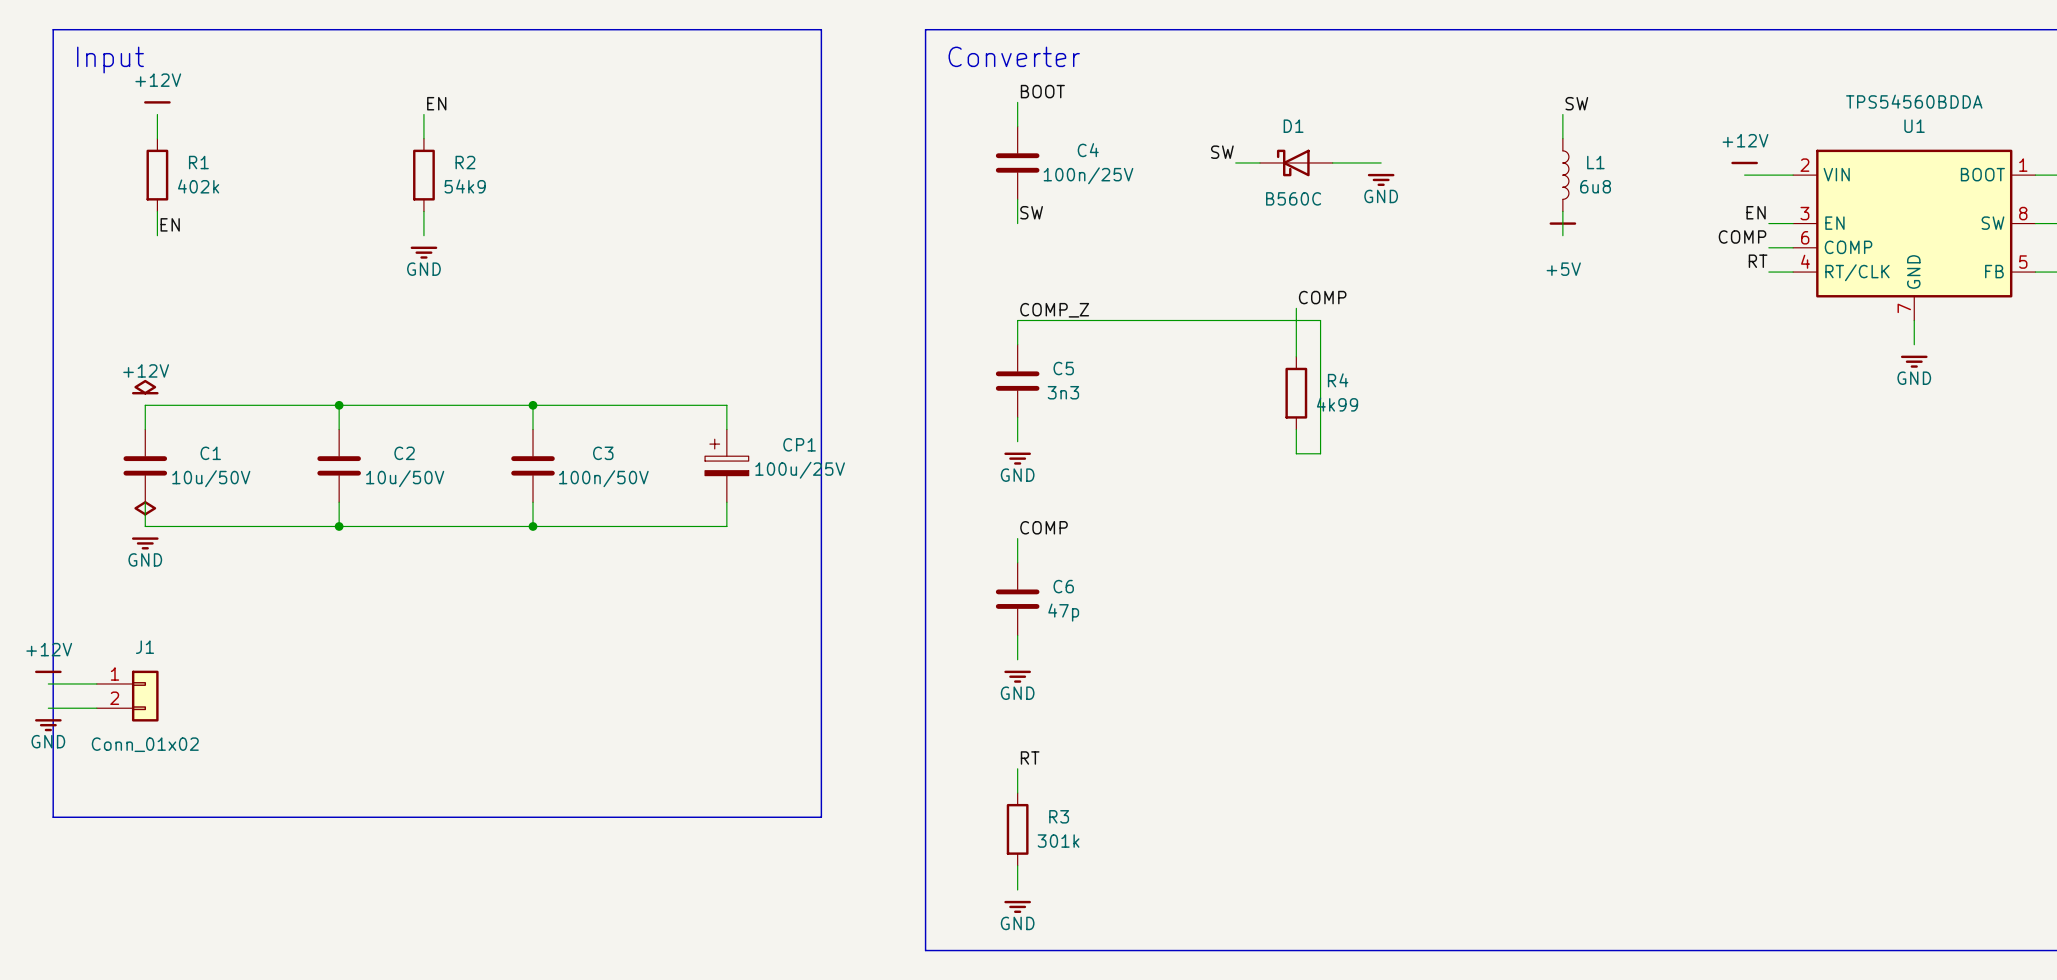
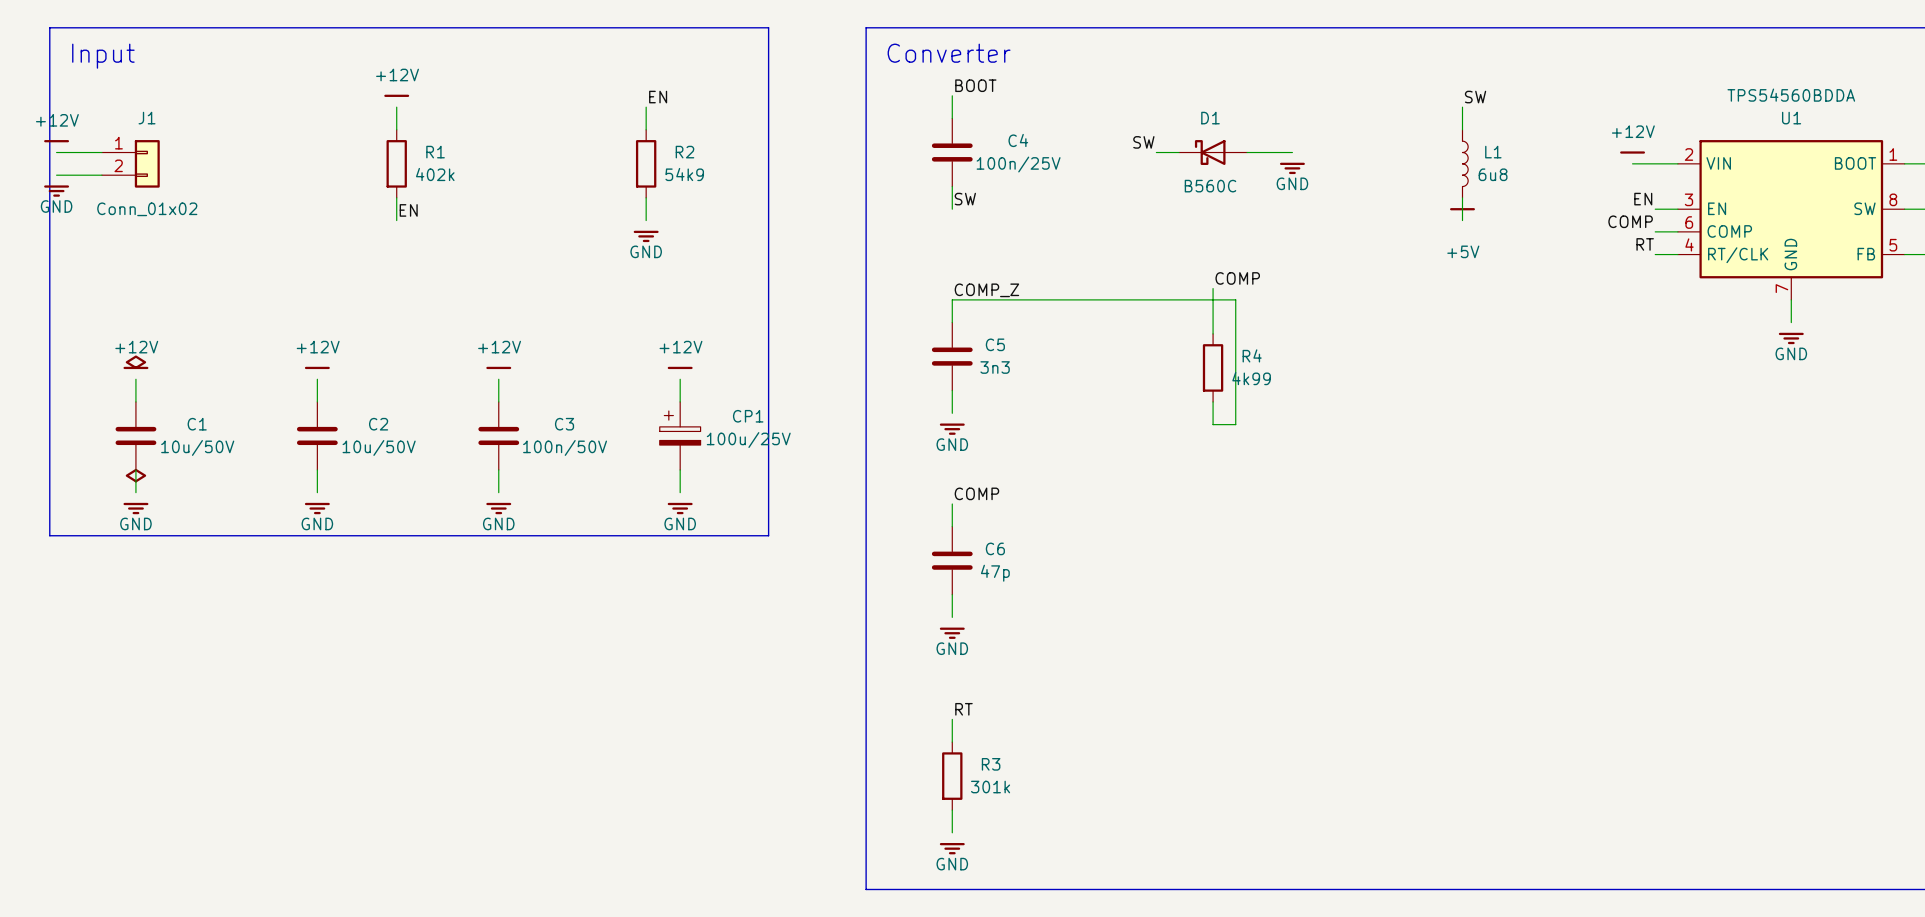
power symbol position: +12V (157, 102) -> +12V (56, 141)
power symbol: none -> +12V (396, 95)
label position: EN (436, 103) -> EN (408, 210)
label: none -> EN (658, 97)
wire: (157, 114) (157, 138) -> none
wire: none -> (646, 107) (646, 129)
wire: none -> (56, 152) (101, 152)
R2 name: R2 (465, 162) -> R1 (435, 152)
R1: 402k (157, 175) -> none
R2: none -> 54k9 (646, 163)
R2 value: 54k9 (465, 186) -> 402k (435, 174)
wire: none -> (56, 175) (101, 175)
power symbol: none -> GND (56, 191)
wire: (157, 211) (157, 235) -> none
wire: none -> (646, 197) (646, 220)
label: EN (170, 224) -> none
power symbol: GND (423, 252) -> none
power symbol: none -> GND (646, 236)
power symbol: none -> +12V (317, 367)
power symbol: none -> +12V (498, 367)
power symbol: none -> +12V (680, 367)
wire: (145, 405) (726, 405) -> none
junction: (339, 405) -> none
junction: (533, 405) -> none
wire: (145, 526) (726, 526) -> none
junction: (339, 526) -> none
junction: (533, 526) -> none
power symbol: none -> GND (317, 508)
power symbol: none -> GND (498, 508)
power symbol: none -> GND (680, 508)
line: (53, 572) (53, 817) (821, 817) (821, 572) -> (49, 535) (768, 535)
power symbol: +12V (48, 671) -> none
wire: (48, 683) (96, 683) -> none
J1 position: (127, 696) -> (130, 163)
wire: (48, 708) (96, 708) -> none
power symbol: GND (48, 725) -> none

